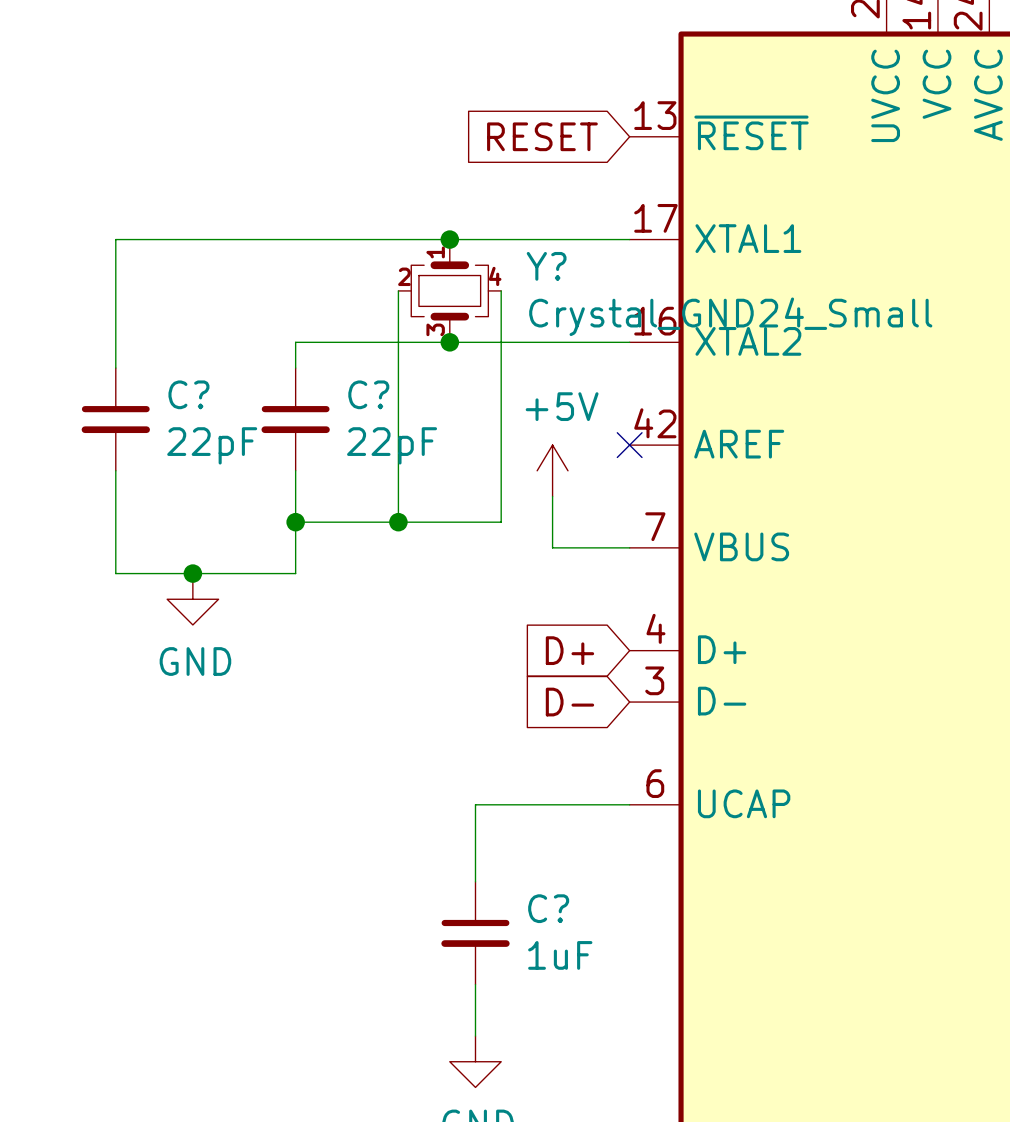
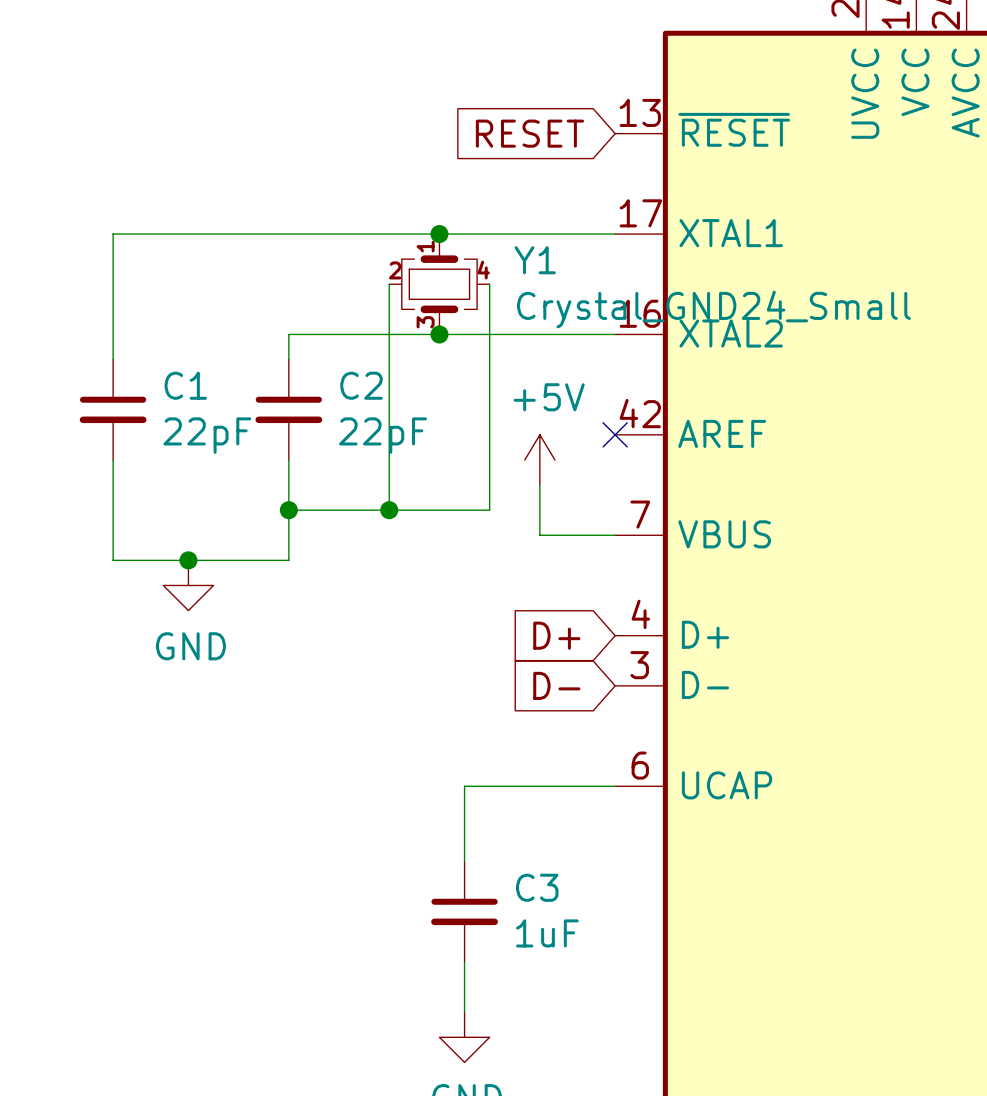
Y? name: Y? (546, 266) -> Y1 (535, 260)
C? name: C? (188, 394) -> C1 (185, 385)
C? name: C? (368, 394) -> C2 (361, 385)
C? name: C? (548, 908) -> C3 (537, 887)

